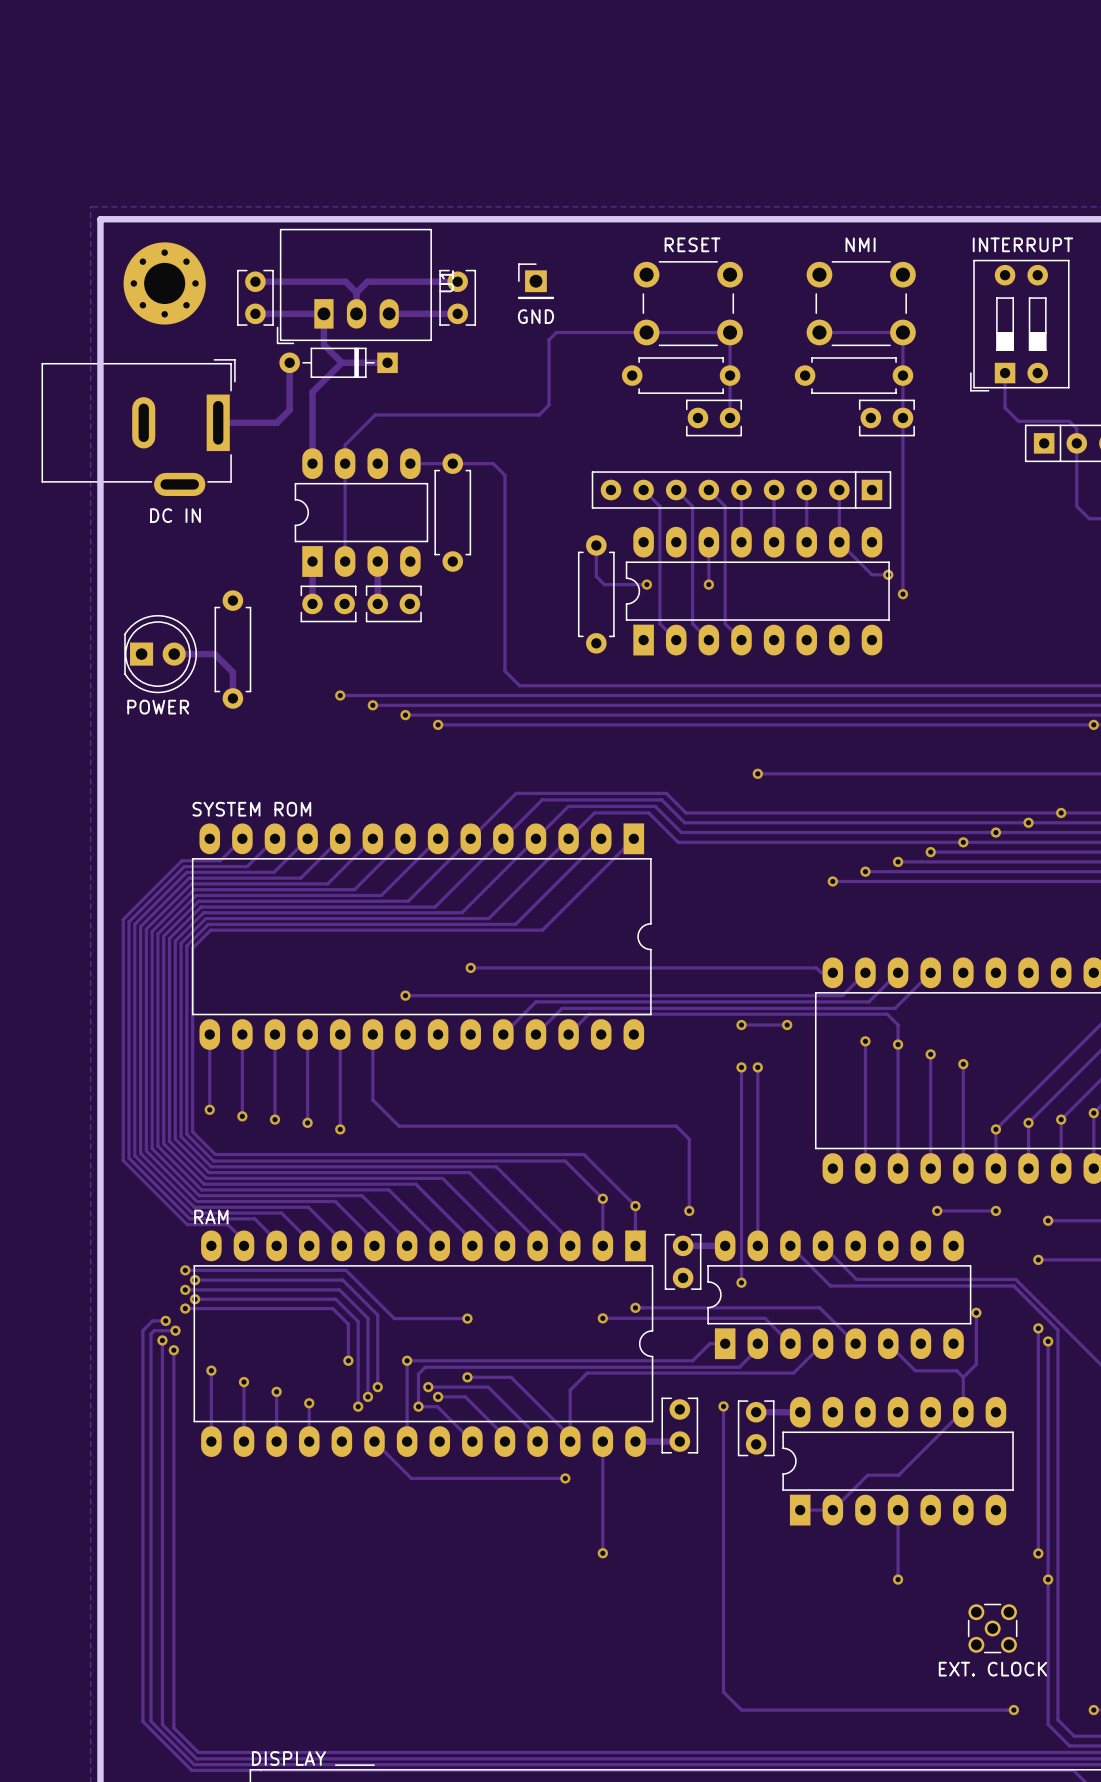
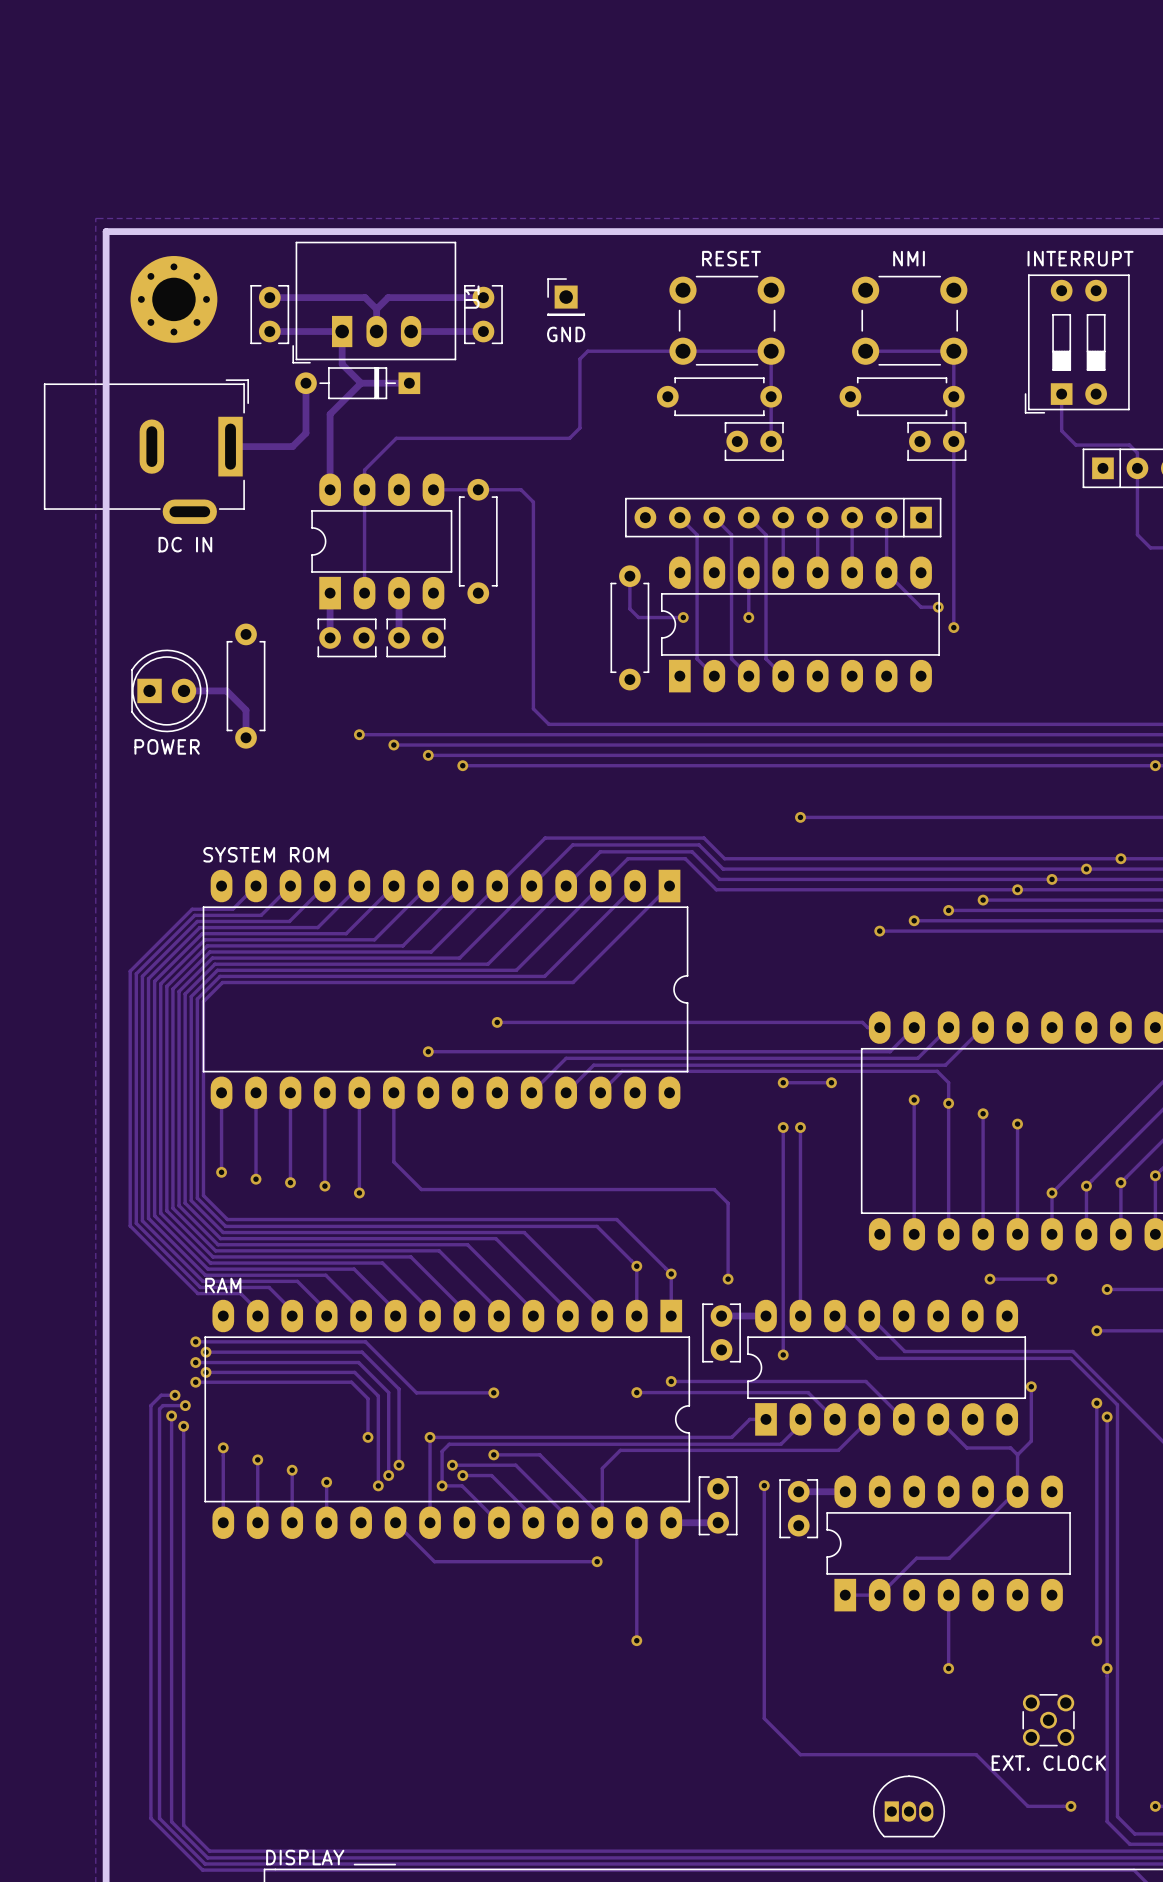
track: (723, 1626) (723, 1692) (741, 1710) (973, 1710) -> (764, 1718) (800, 1754) (976, 1754) (1027, 1806)
part: none -> (909, 1806)

